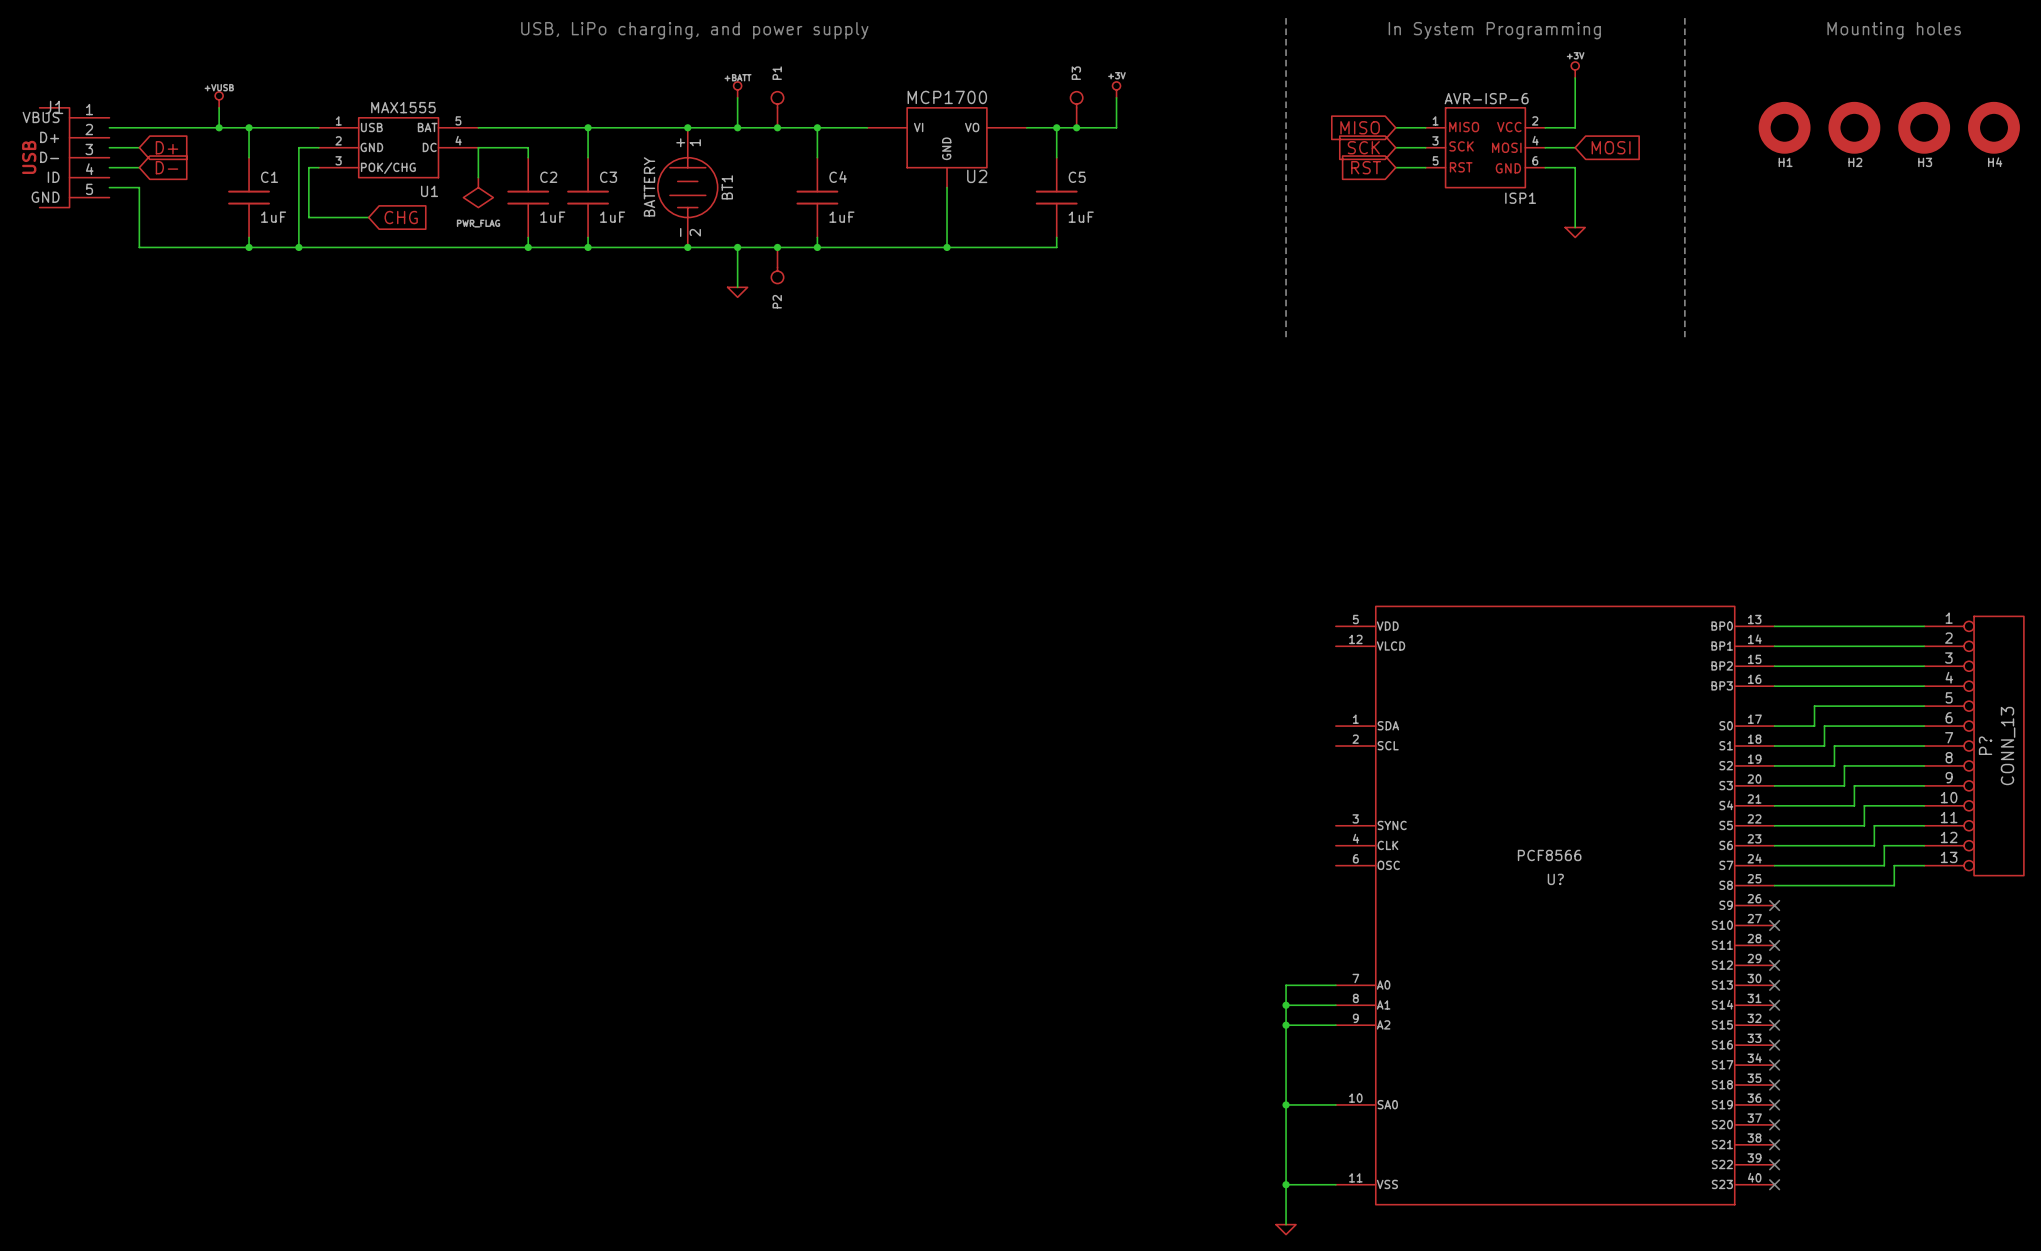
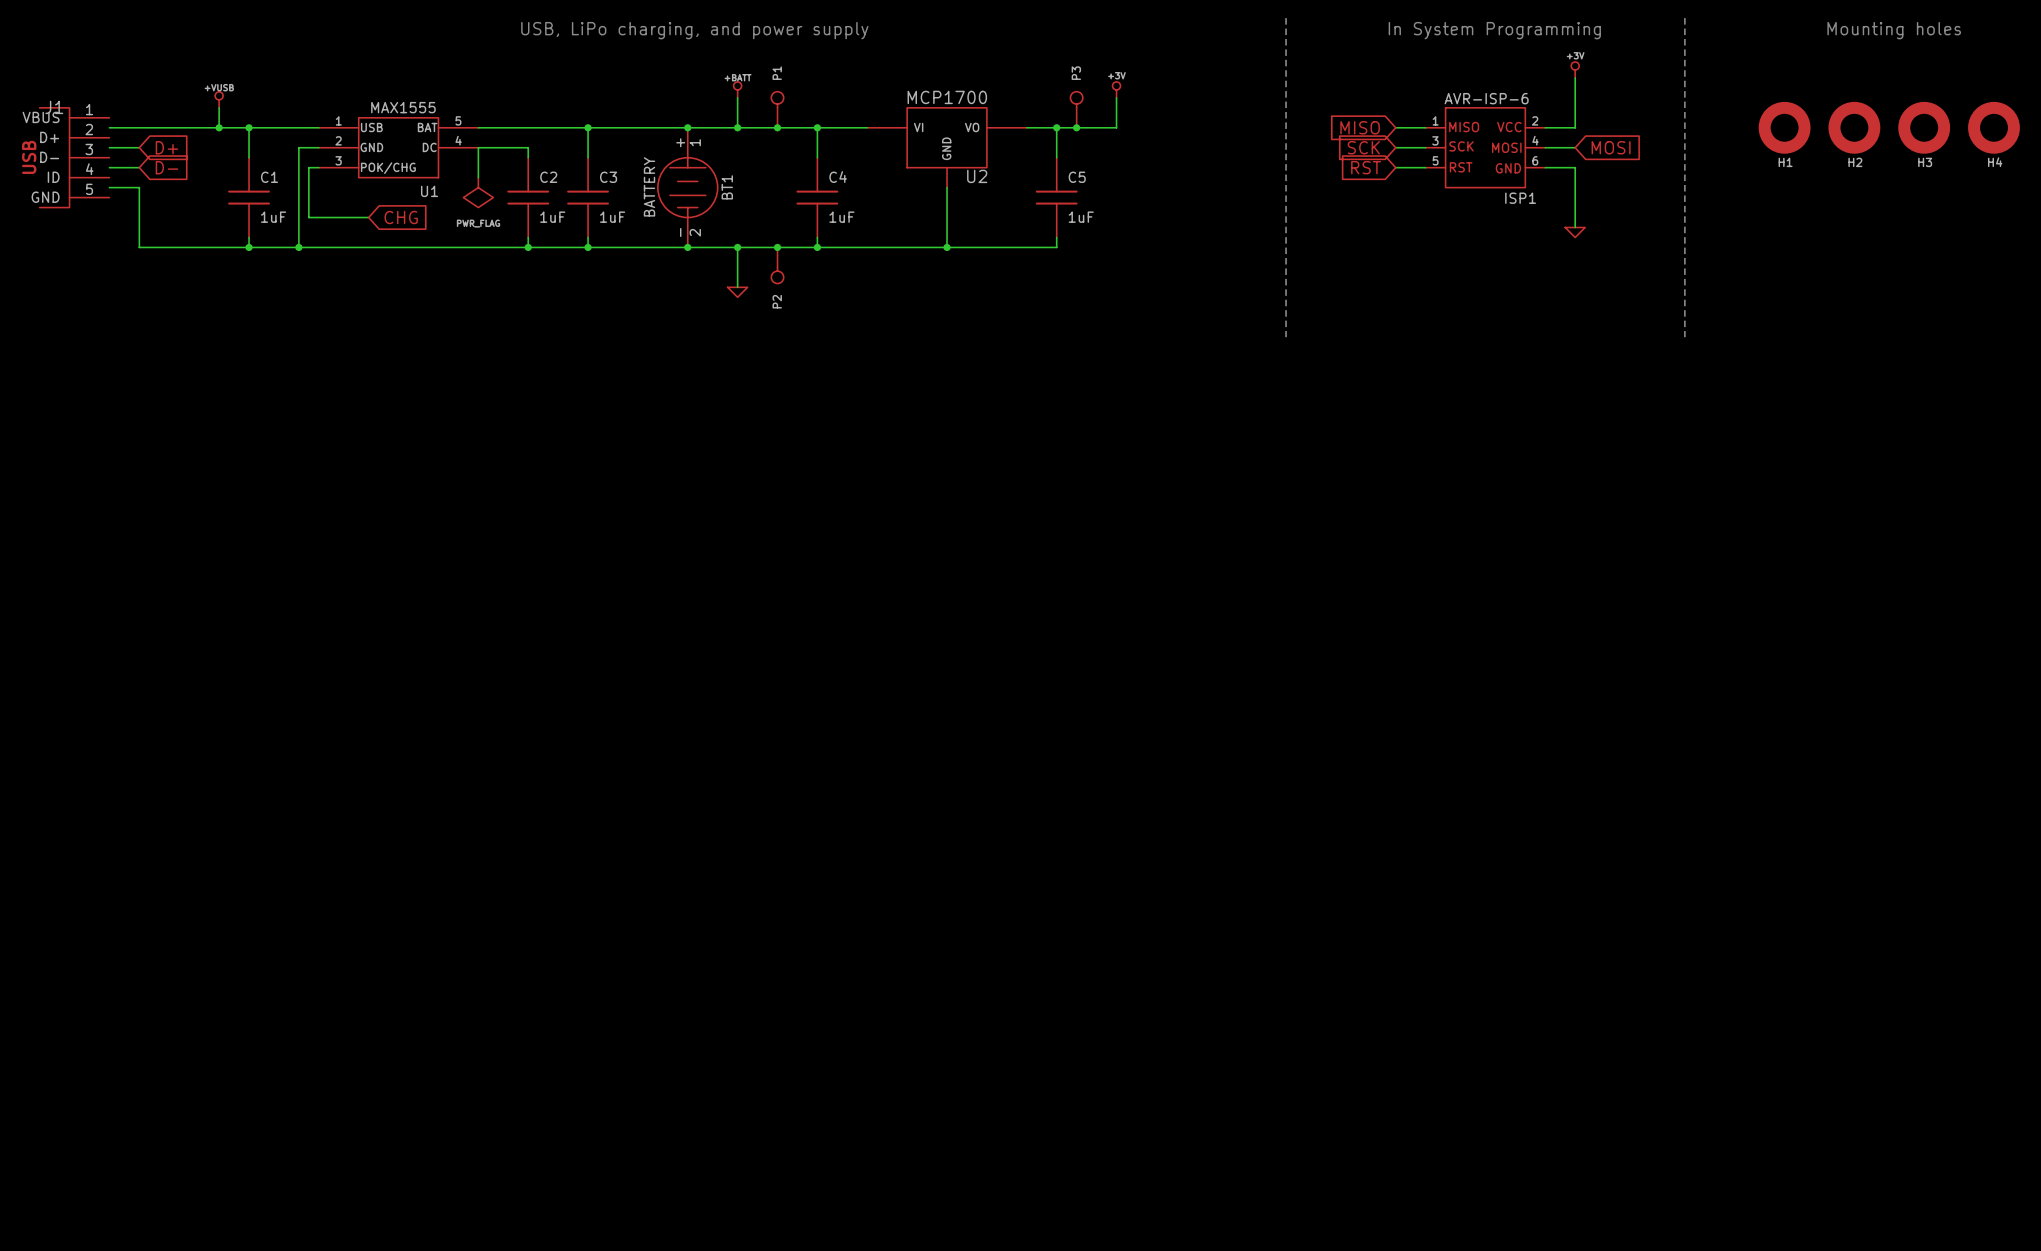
wire: (1774, 626) (1924, 626) -> none
wire: (1774, 646) (1924, 646) -> none
wire: (1774, 666) (1924, 666) -> none
wire: (1774, 686) (1924, 686) -> none
wire: (1924, 706) (1814, 706) (1814, 726) (1774, 726) -> none
wire: (1924, 726) (1824, 726) (1824, 746) (1774, 746) -> none
wire: (1924, 746) (1834, 746) (1834, 765) (1774, 765) -> none
P?: CONN_13 (1974, 746) -> none
wire: (1924, 765) (1844, 765) (1844, 785) (1774, 785) -> none
wire: (1924, 785) (1854, 785) (1854, 805) (1774, 805) -> none
wire: (1924, 805) (1864, 805) (1864, 825) (1774, 825) -> none
wire: (1924, 825) (1874, 825) (1874, 845) (1774, 845) -> none
wire: (1924, 845) (1884, 845) (1884, 865) (1774, 865) -> none
wire: (1924, 865) (1894, 865) (1894, 885) (1774, 885) -> none
U?: PCF8566 (1555, 905) -> none
no-connect mark: (1774, 905) -> none
no-connect mark: (1774, 925) -> none
no-connect mark: (1774, 945) -> none
no-connect mark: (1774, 965) -> none
wire: (1335, 985) (1286, 985) (1286, 1224) -> none
no-connect mark: (1774, 985) -> none
wire: (1286, 1005) (1335, 1005) -> none
junction: (1286, 1005) -> none
no-connect mark: (1774, 1005) -> none
wire: (1286, 1025) (1335, 1025) -> none
junction: (1286, 1025) -> none
no-connect mark: (1774, 1025) -> none
no-connect mark: (1774, 1045) -> none
no-connect mark: (1774, 1065) -> none
no-connect mark: (1774, 1085) -> none
wire: (1286, 1104) (1335, 1104) -> none
junction: (1286, 1104) -> none
no-connect mark: (1774, 1104) -> none
no-connect mark: (1774, 1124) -> none
no-connect mark: (1774, 1144) -> none
no-connect mark: (1774, 1164) -> none
wire: (1286, 1184) (1335, 1184) -> none
junction: (1286, 1184) -> none
no-connect mark: (1774, 1184) -> none
power symbol: (1286, 1229) -> none

